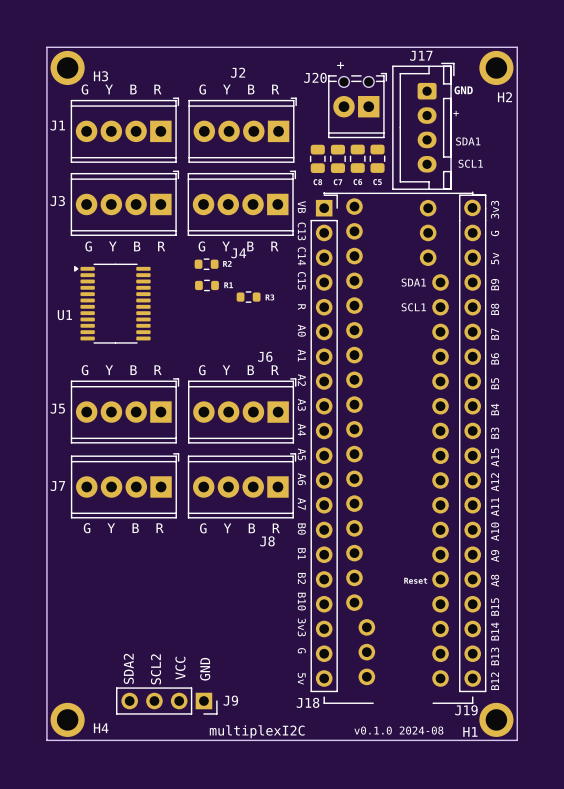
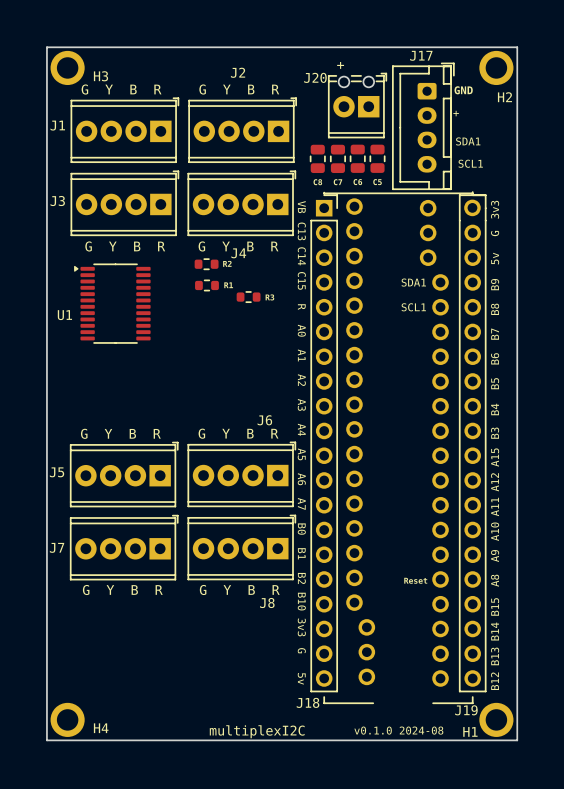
J5 position: (124, 410) -> (124, 474)
J6 position: (242, 410) -> (241, 474)
J7 position: (125, 485) -> (124, 547)
J8 position: (242, 485) -> (241, 547)
text: SDA2 (128, 668) -> none
text: VCC (180, 668) -> none
text: SCL2 (155, 669) -> none
text: GND (205, 669) -> none
J9: (166, 701) -> none

